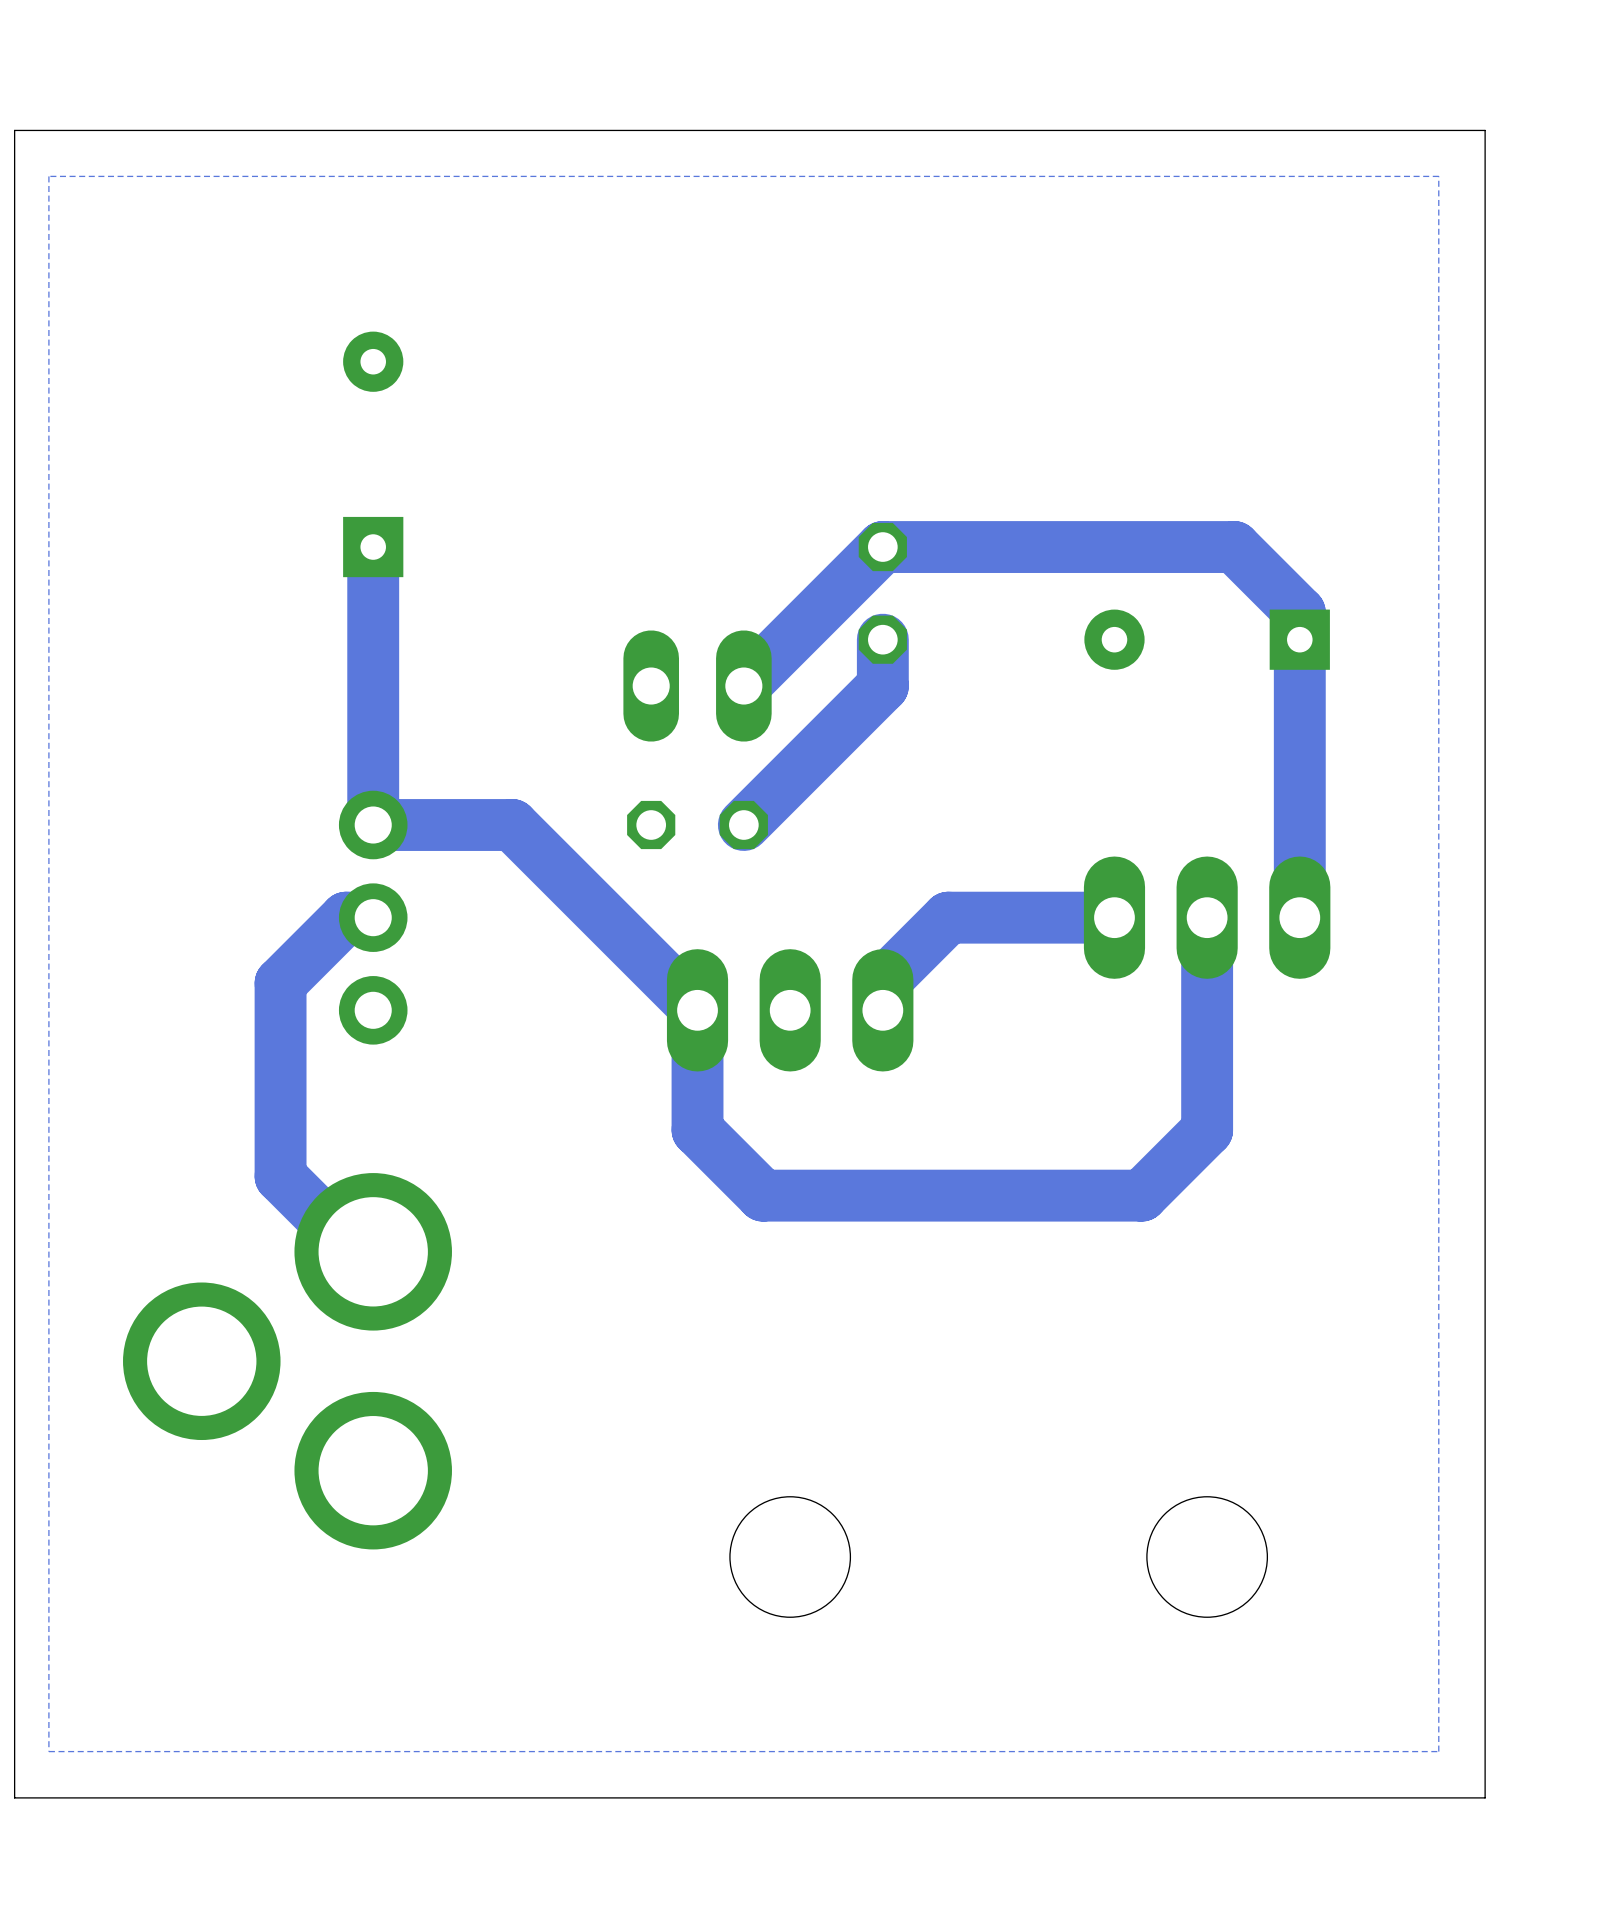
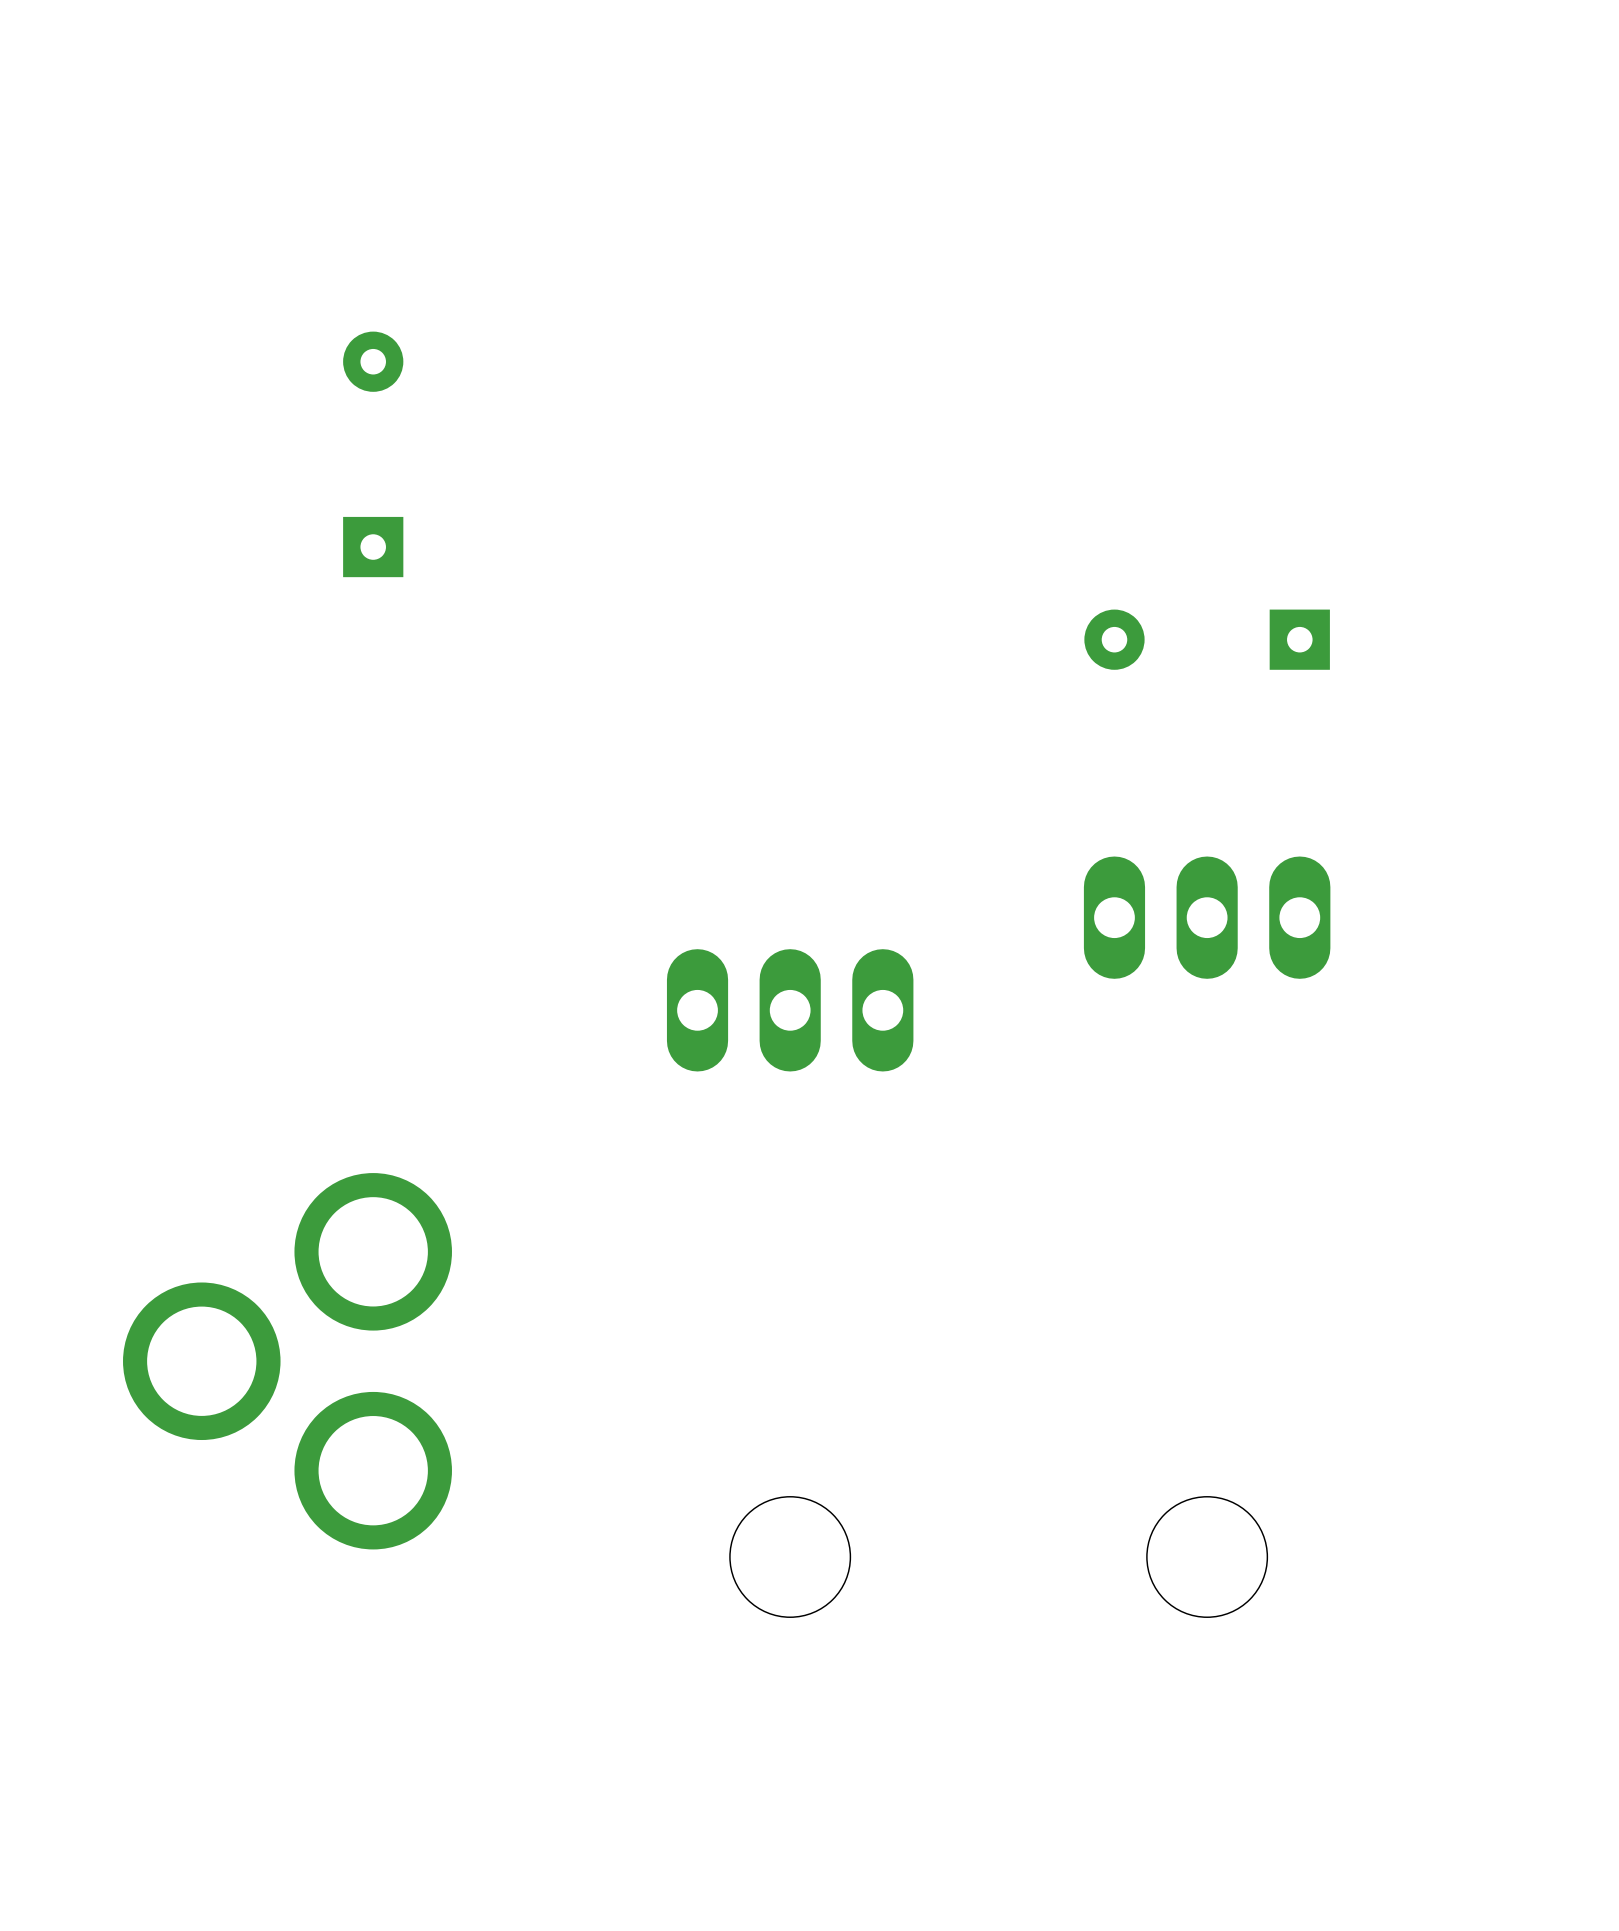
board edge: (1485, 130) (14, 130) (14, 1797) (1485, 1797) (1485, 130) -> none
bottom zone outline: (1438, 176) (48, 176) (48, 1751) (1438, 1751) (1438, 176) -> none
bottom track: (373, 547) (373, 825) (512, 825) (697, 1010) (697, 1130) (763, 1195) (1141, 1195) (1207, 1130) (1207, 917) -> none
part: (882, 593) -> none
bottom track: (882, 639) (882, 686) (743, 825) -> none
part: (697, 686) -> none
bottom track: (743, 686) (882, 547) (1234, 547) (1299, 612) (1299, 917) -> none
part: (697, 825) -> none
bottom track: (373, 917) (346, 917) (280, 983) (280, 1176) (346, 1241) (373, 1241) -> none
part: (373, 917) -> none
bottom track: (1114, 917) (948, 917) (882, 983) (882, 1010) -> none

